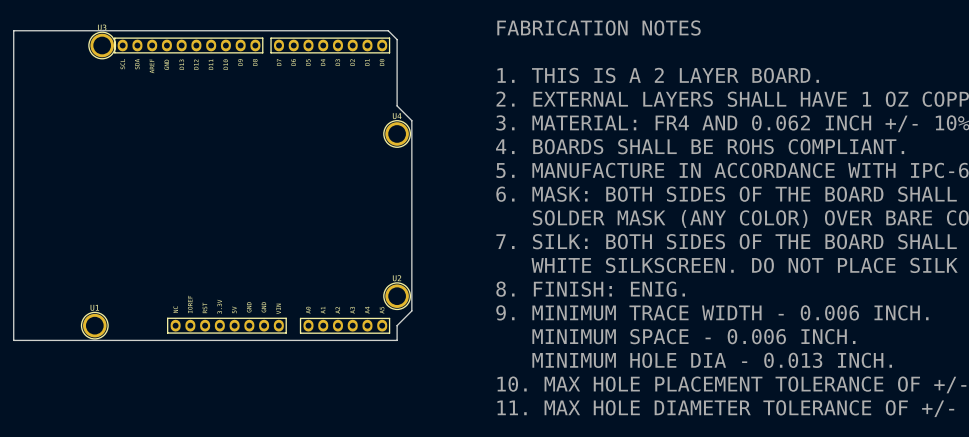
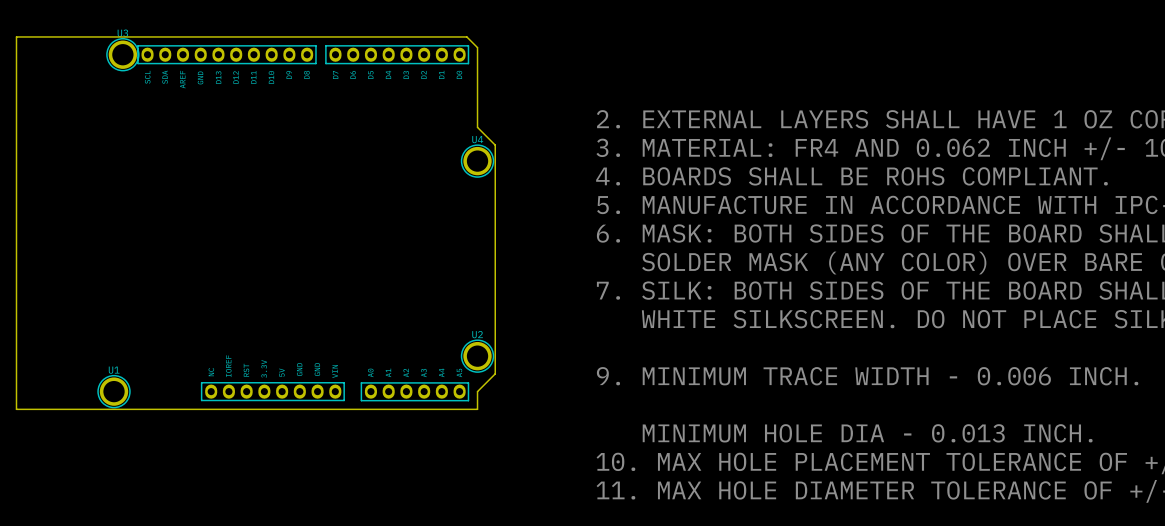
text: FABRICATION NOTES (599, 28) -> none
text: 1. THIS IS A 2 LAYER BOARD. (658, 75) -> none
text: 8. FINISH: ENIG. (590, 289) -> none
text: MINIMUM SPACE - 0.006 INCH. (693, 336) -> none

